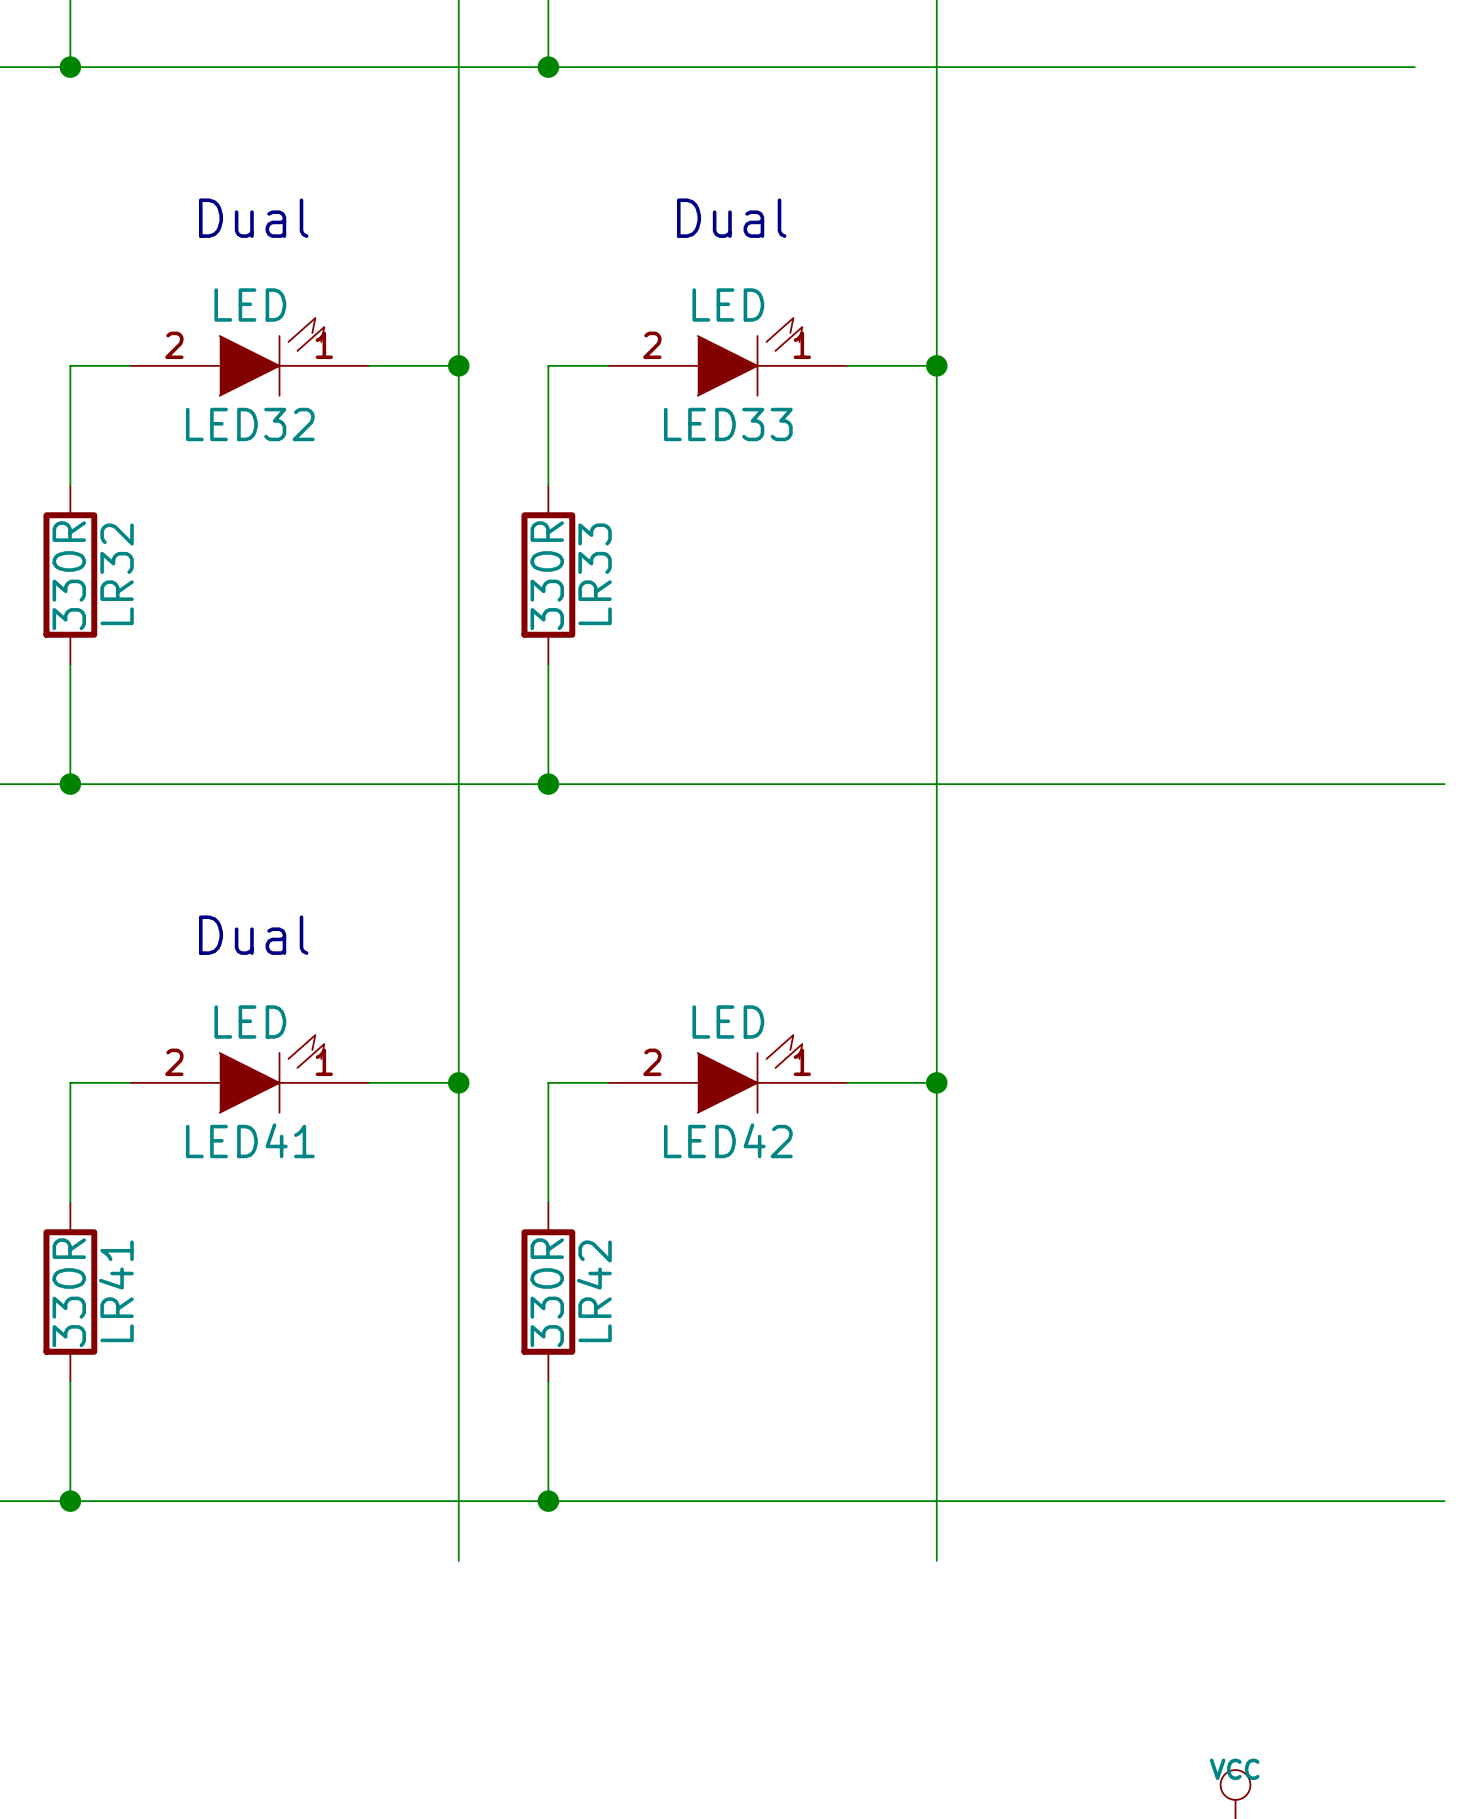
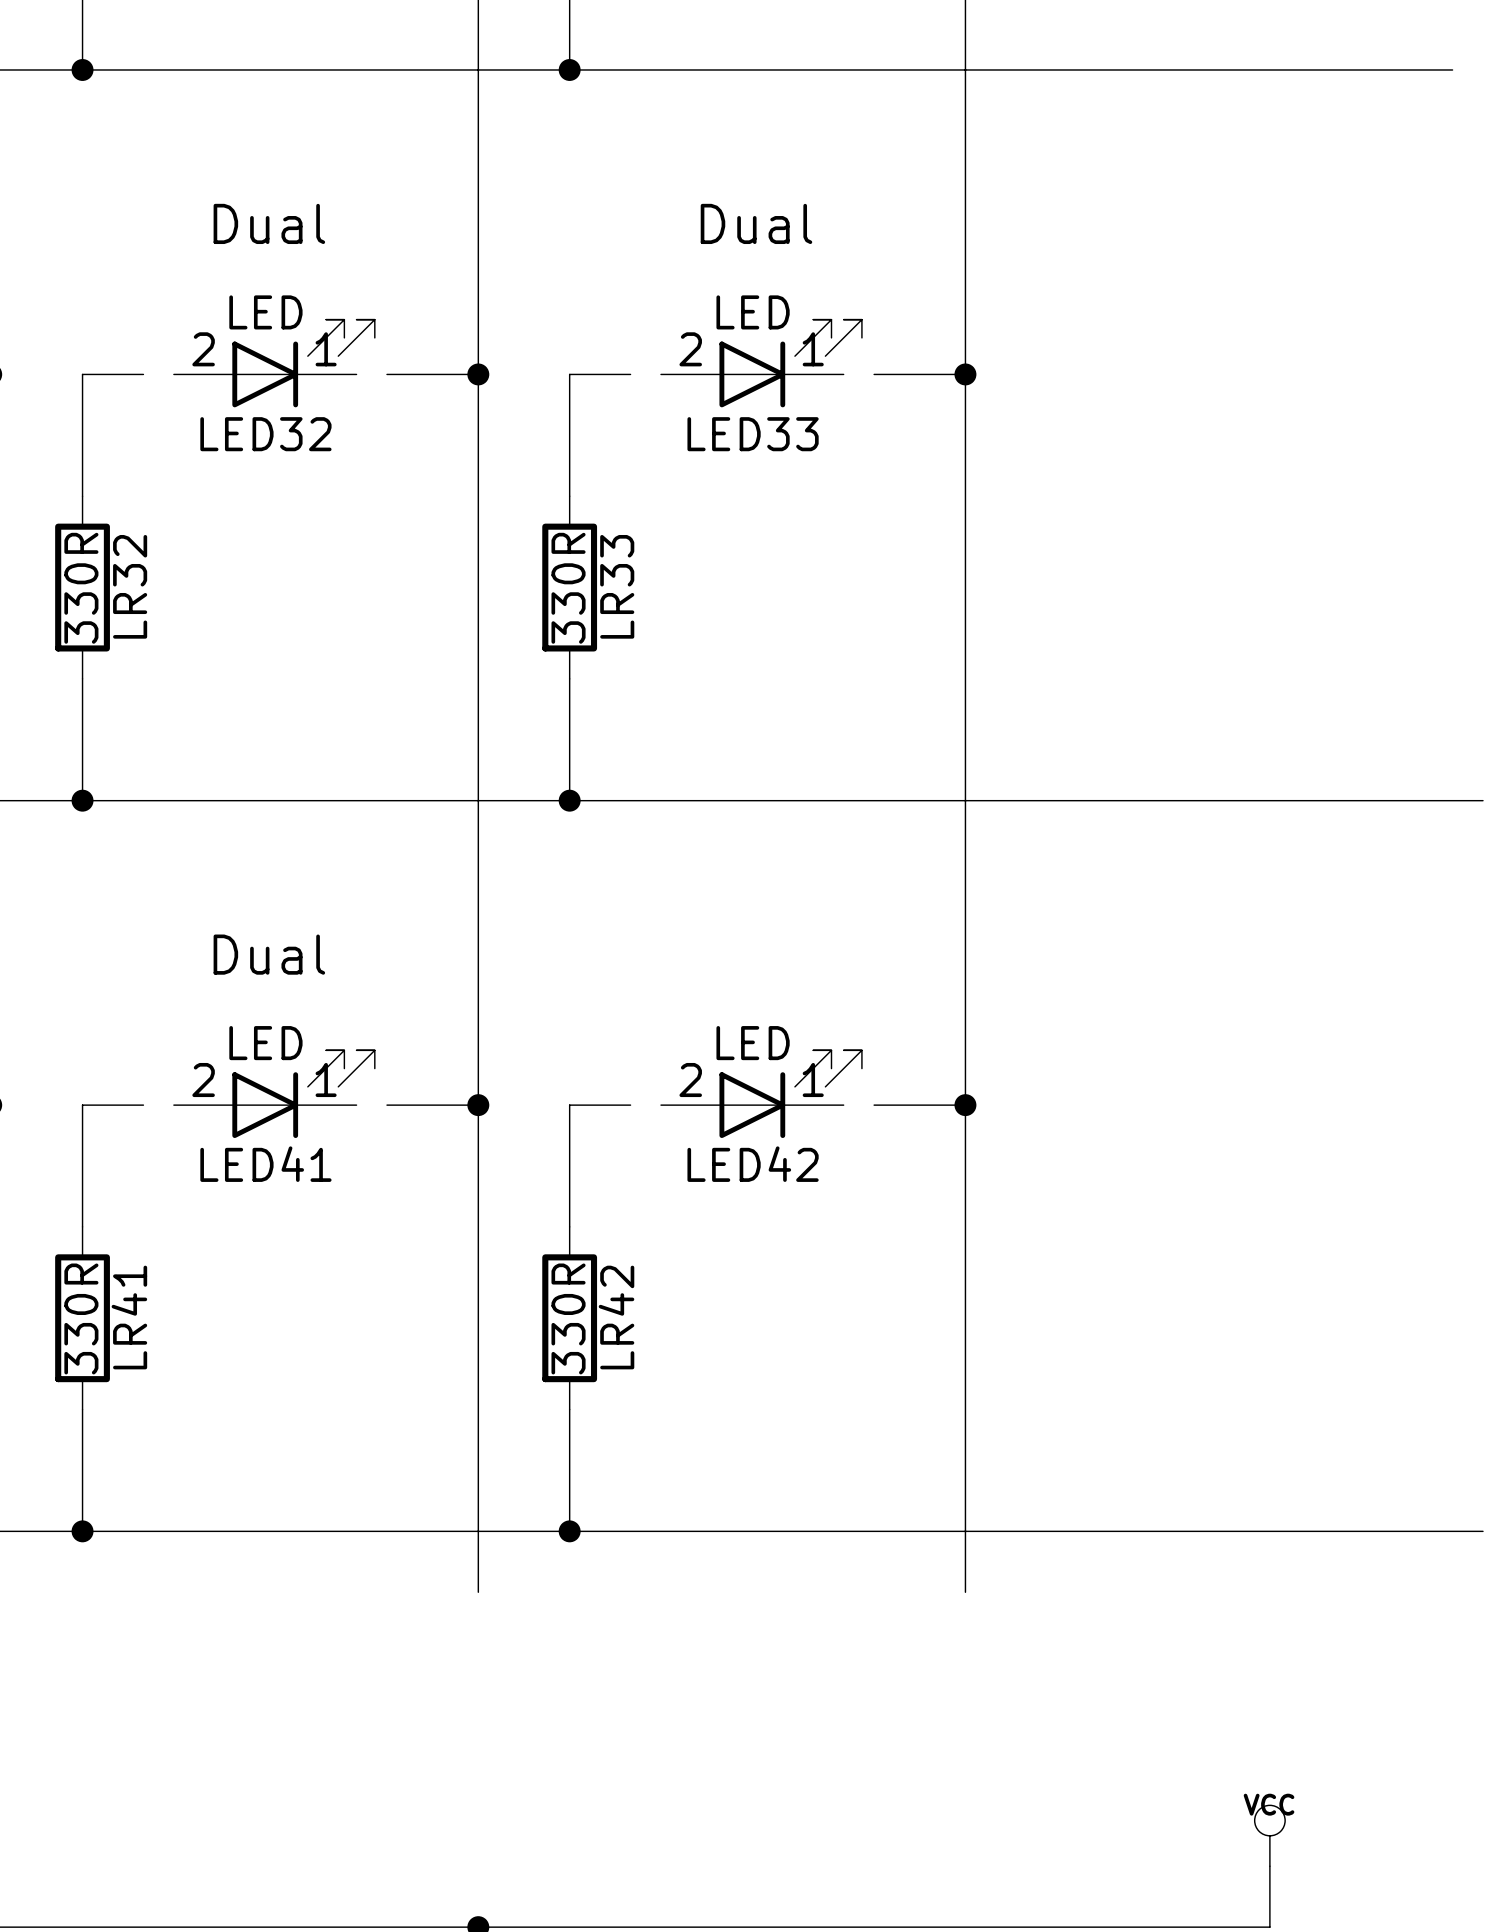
LED32 symbol: [130, 318, 370, 396] -> [173, 319, 375, 408]
LED33 symbol: [608, 318, 848, 396] -> [661, 319, 862, 408]
LED41 symbol: [130, 1035, 370, 1113] -> [173, 1050, 375, 1139]
LED42 symbol: [608, 1035, 848, 1113] -> [661, 1050, 862, 1139]

